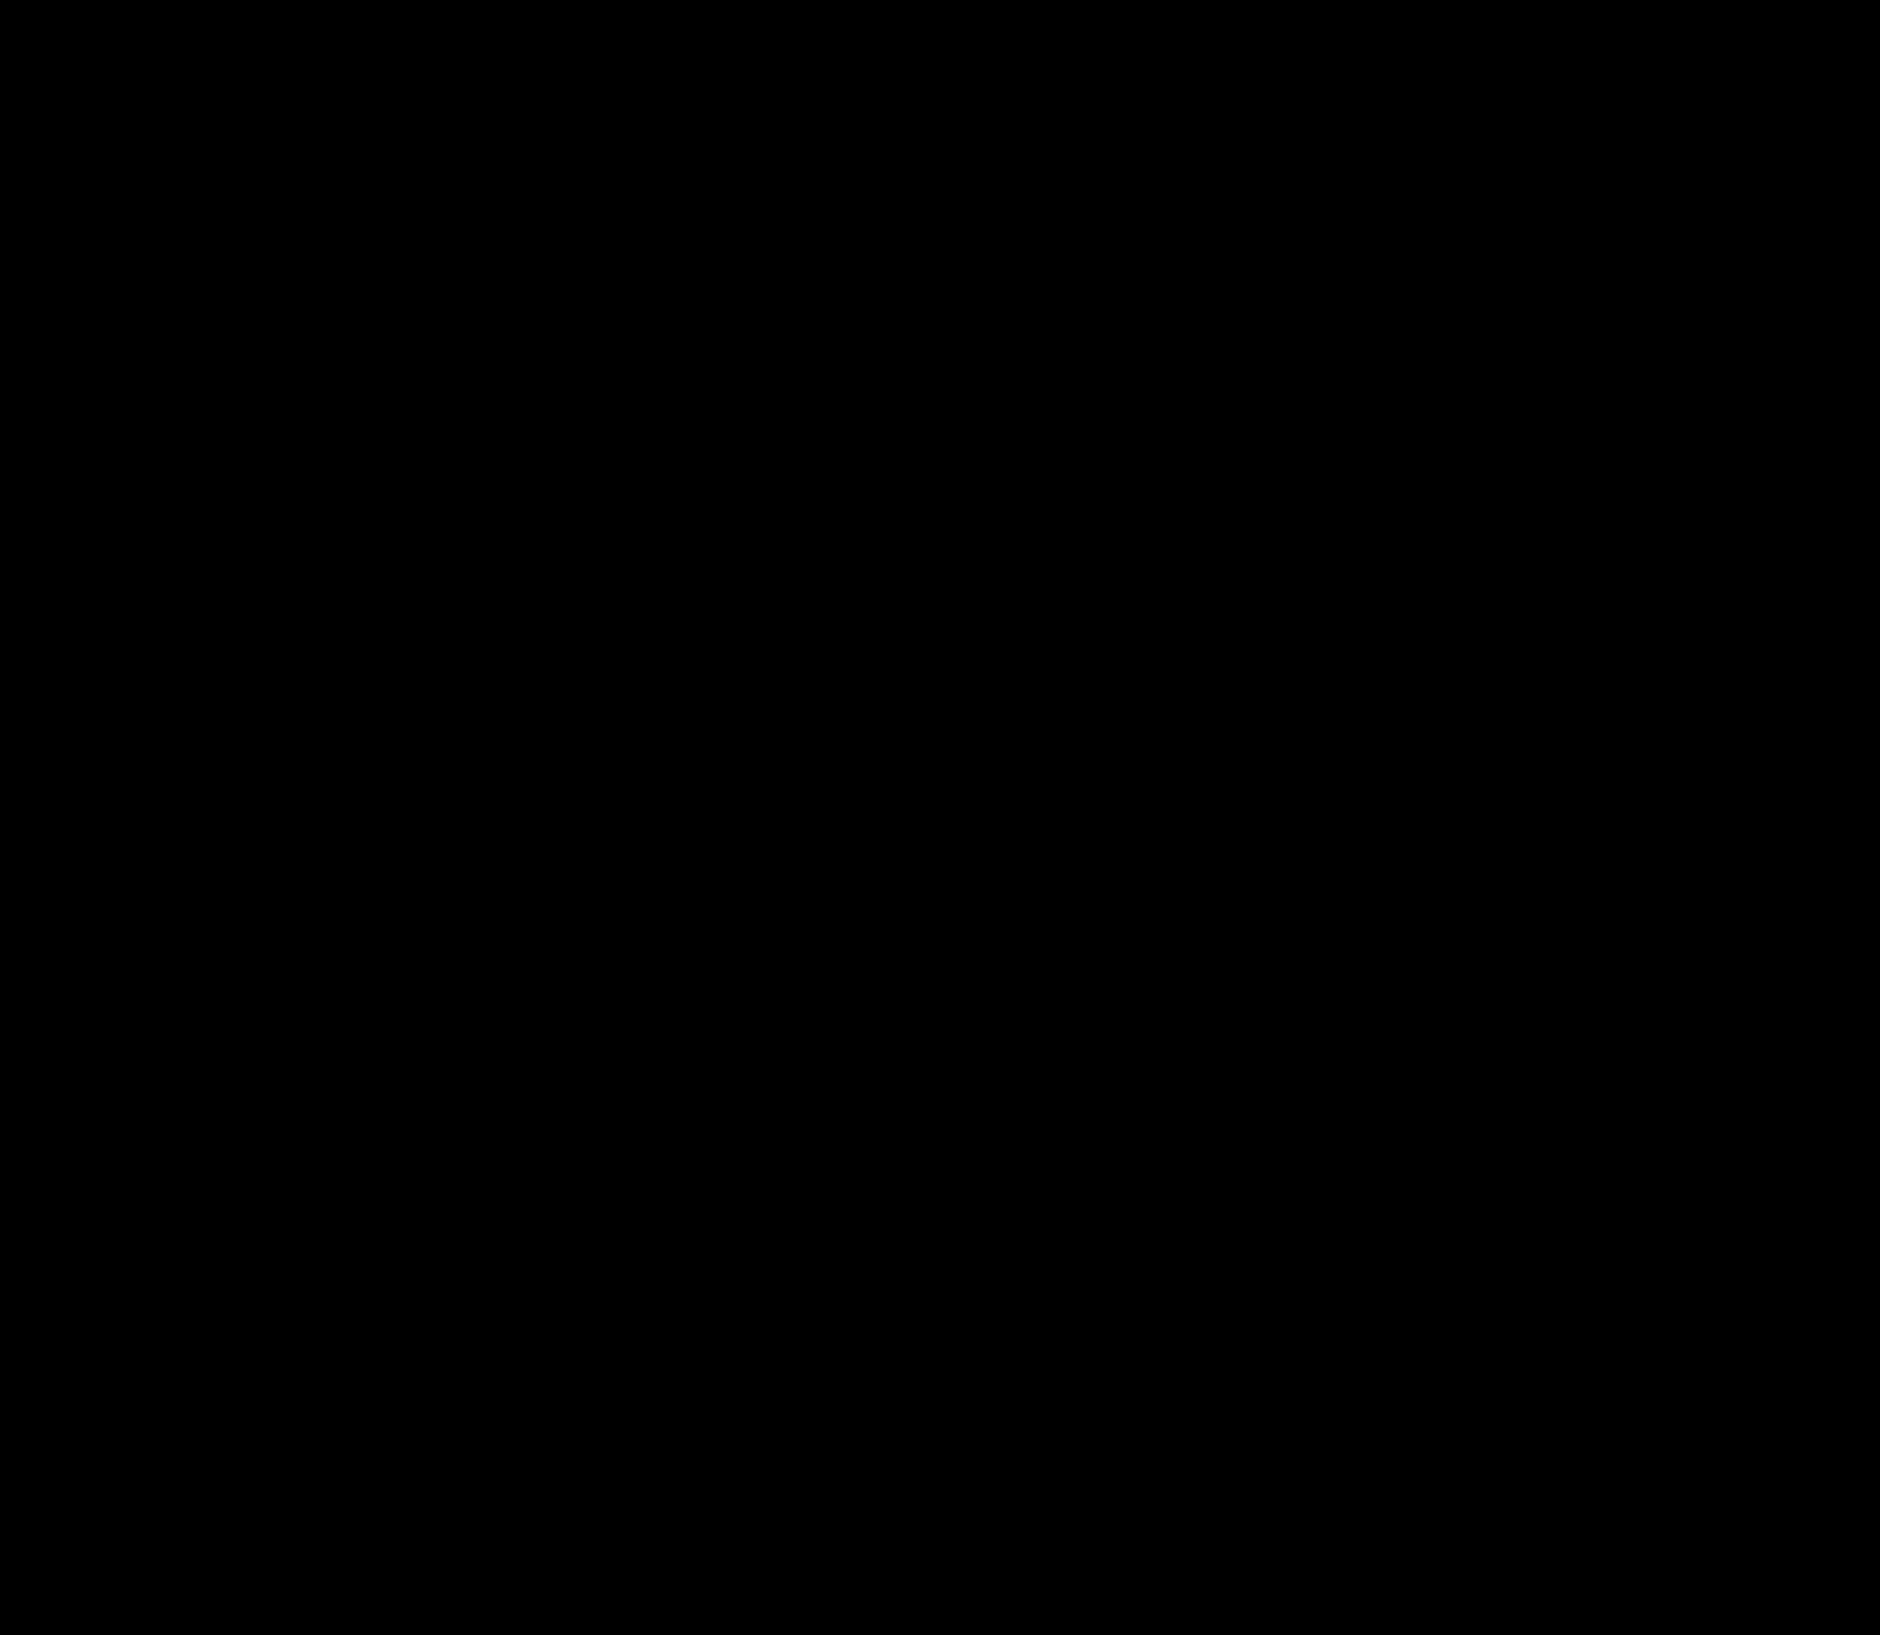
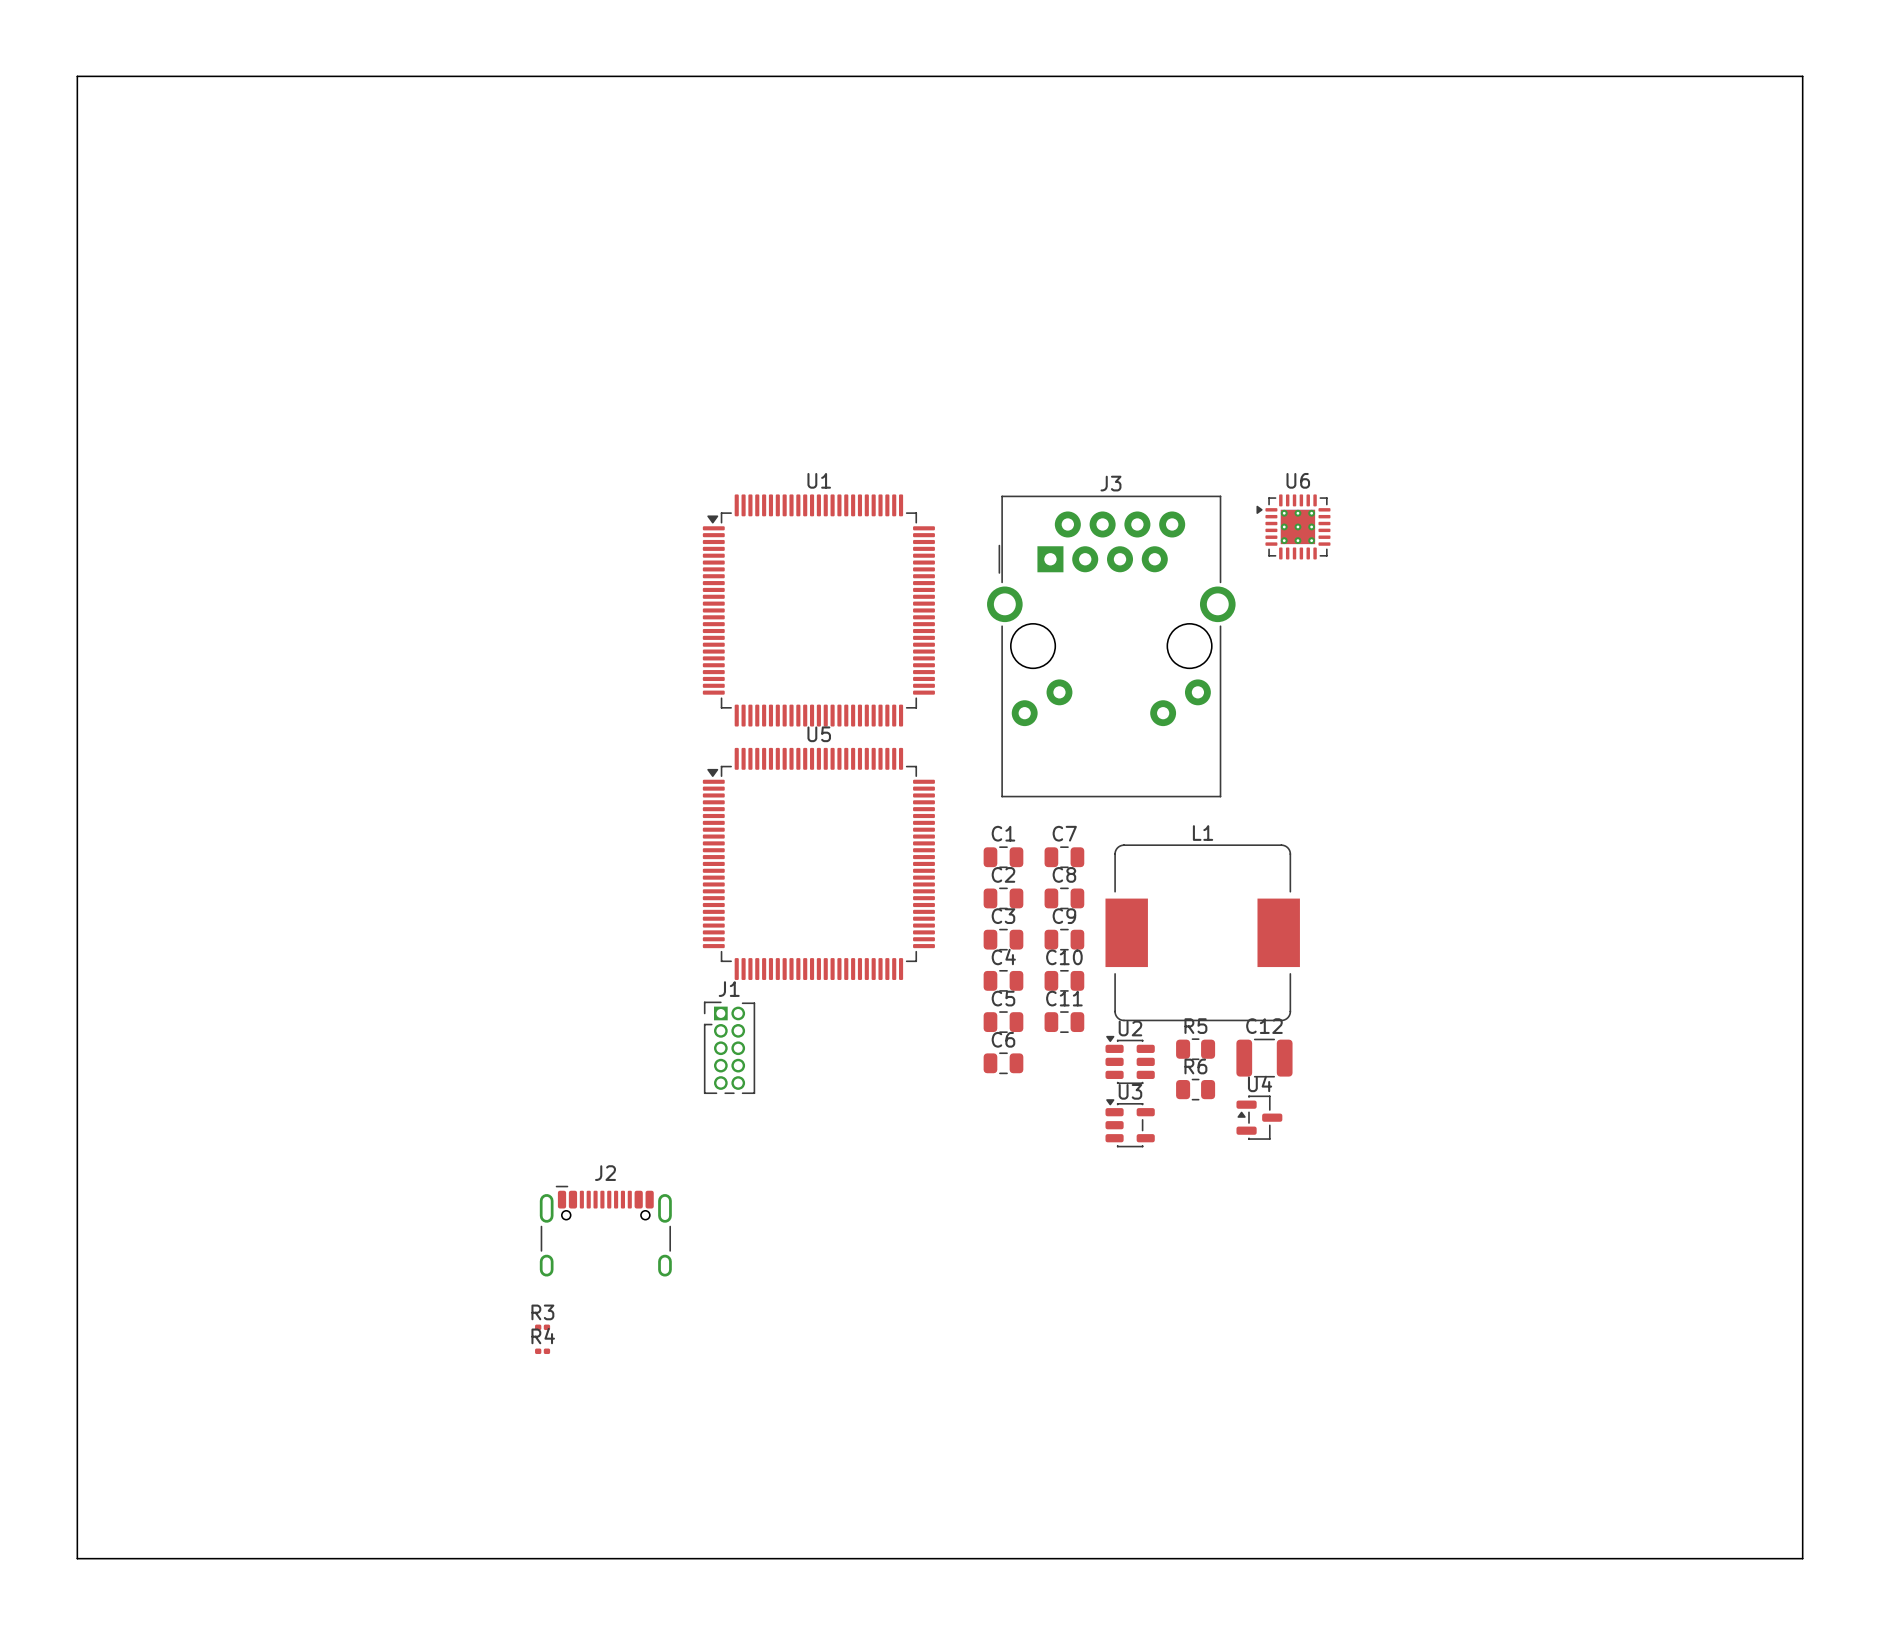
board edge: none -> (77, 76) (1802, 76) (1802, 1558) (77, 1558) (77, 76)
U6: none -> (1293, 526)
U1: none -> (818, 610)
J3: none -> (1111, 646)
C1: none -> (1003, 857)
C7: none -> (1064, 857)
U5: none -> (818, 863)
C2: none -> (1003, 898)
C8: none -> (1064, 898)
L1: none -> (1202, 932)
C3: none -> (1003, 939)
C9: none -> (1064, 939)
C4: none -> (1003, 980)
C10: none -> (1064, 980)
C5: none -> (1003, 1022)
C11: none -> (1064, 1022)
J1: none -> (729, 1047)
R5: none -> (1195, 1049)
C12: none -> (1264, 1058)
U2: none -> (1130, 1059)
C6: none -> (1003, 1063)
R6: none -> (1195, 1089)
U4: none -> (1259, 1117)
U3: none -> (1130, 1123)
J2: none -> (605, 1231)
R3: none -> (542, 1327)
R4: none -> (542, 1351)

